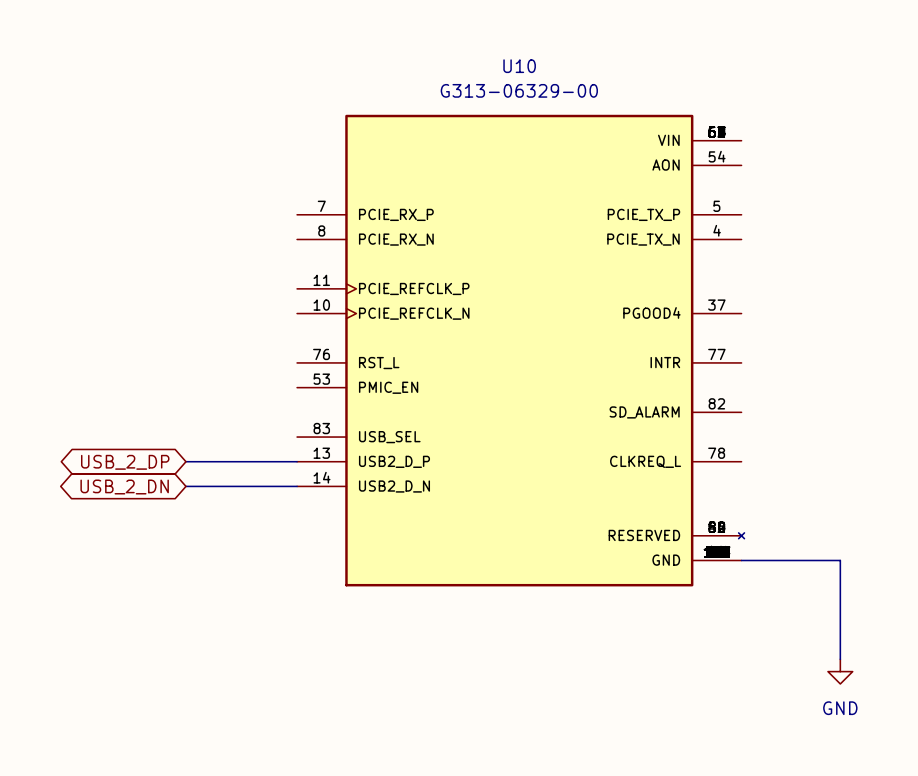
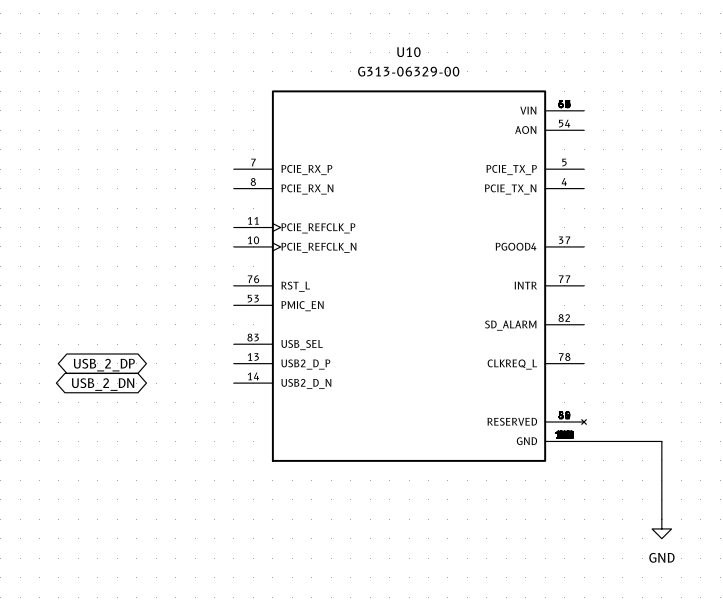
wire: (185, 461) (297, 461) -> none
wire: (185, 486) (297, 486) -> none

